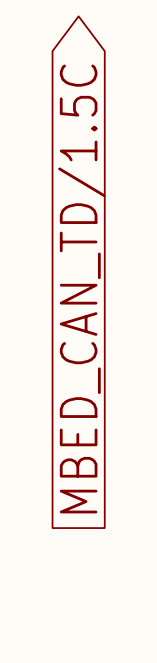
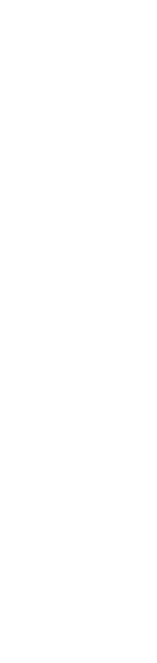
global label: MBED_CAN_TD/1.5C (81, 288) -> none

